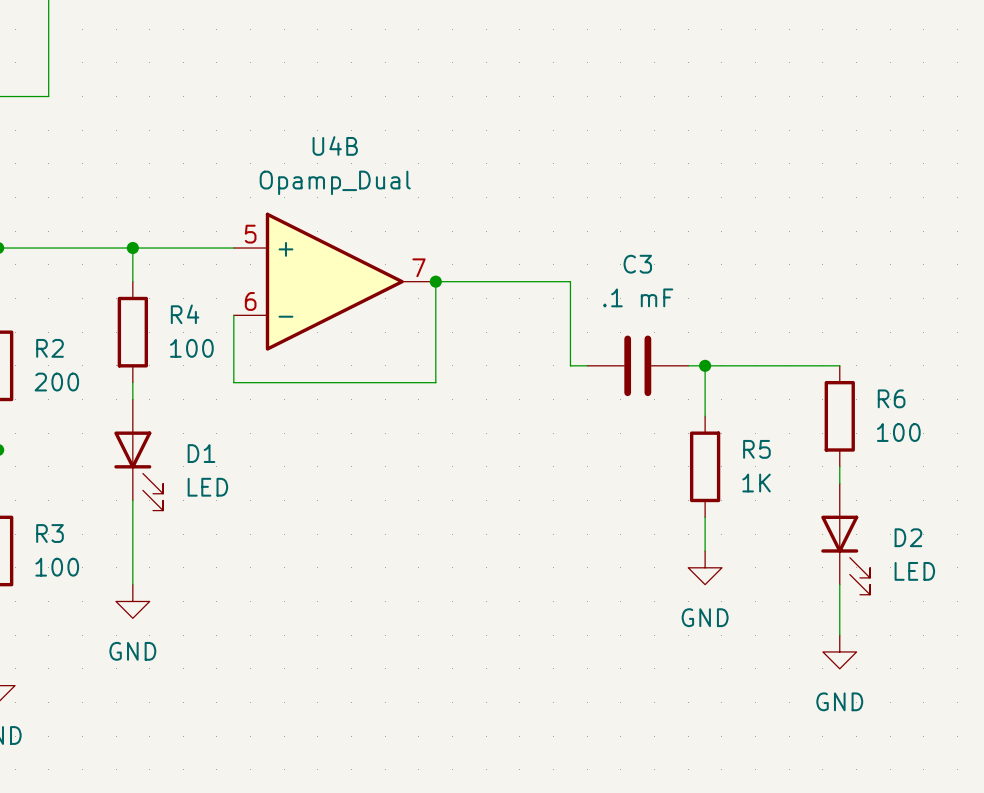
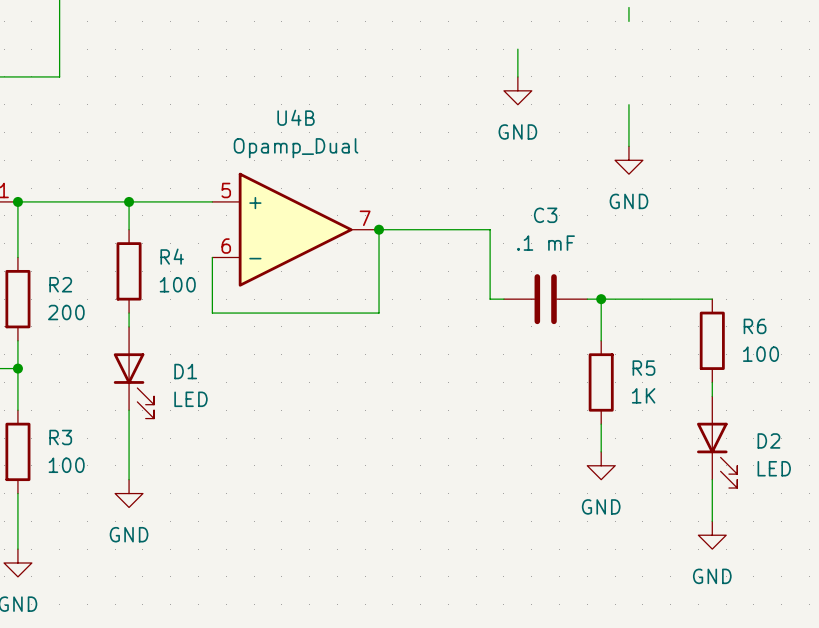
wire: none -> (628, 7) (628, 21)
wire: none -> (517, 49) (517, 76)
power symbol: none -> GND (517, 90)
wire: none -> (628, 104) (628, 146)
power symbol: none -> GND (628, 160)

